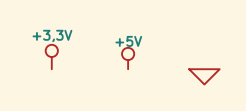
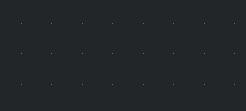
power symbol: +3,3V (51, 57) -> none
power symbol: +5V (128, 58) -> none
power symbol: (204, 76) -> none

